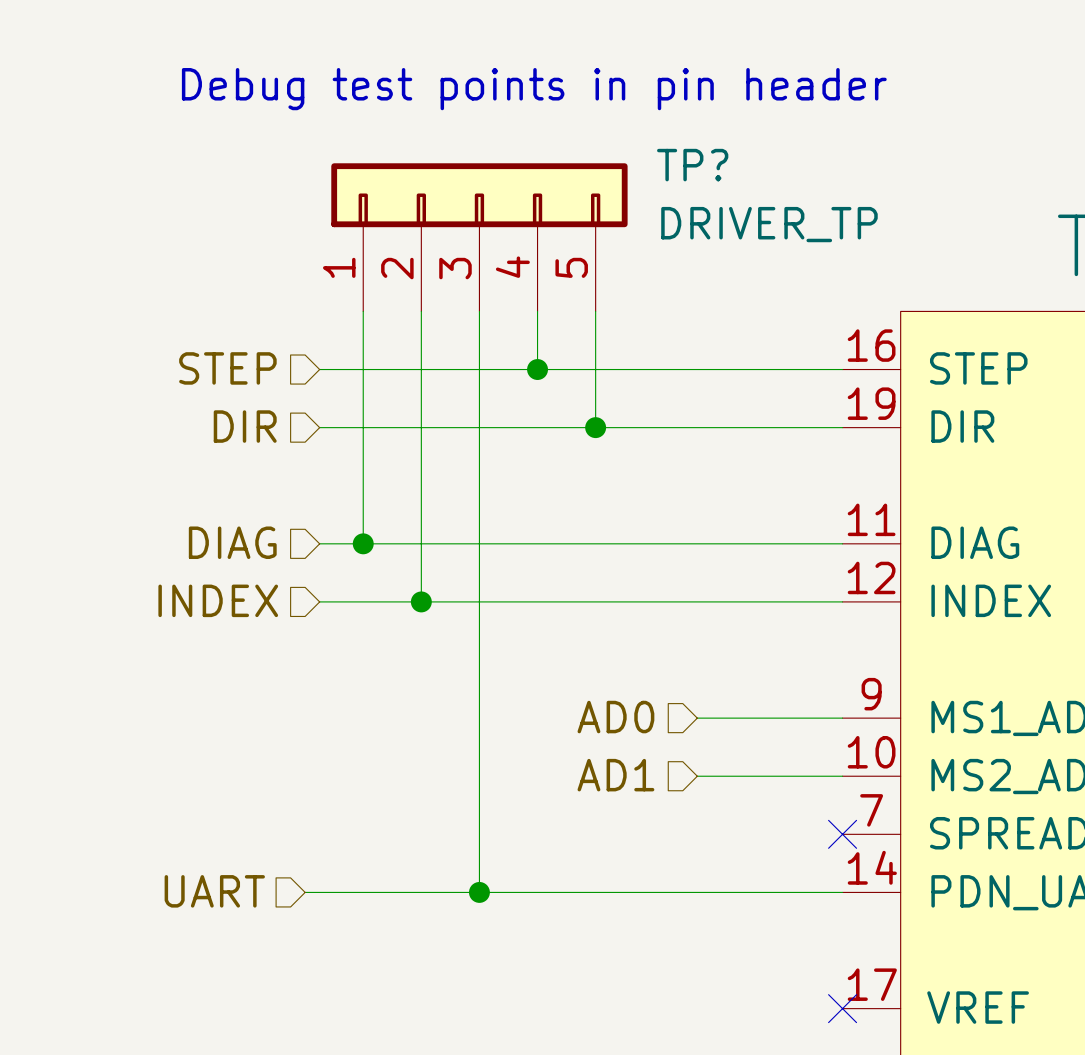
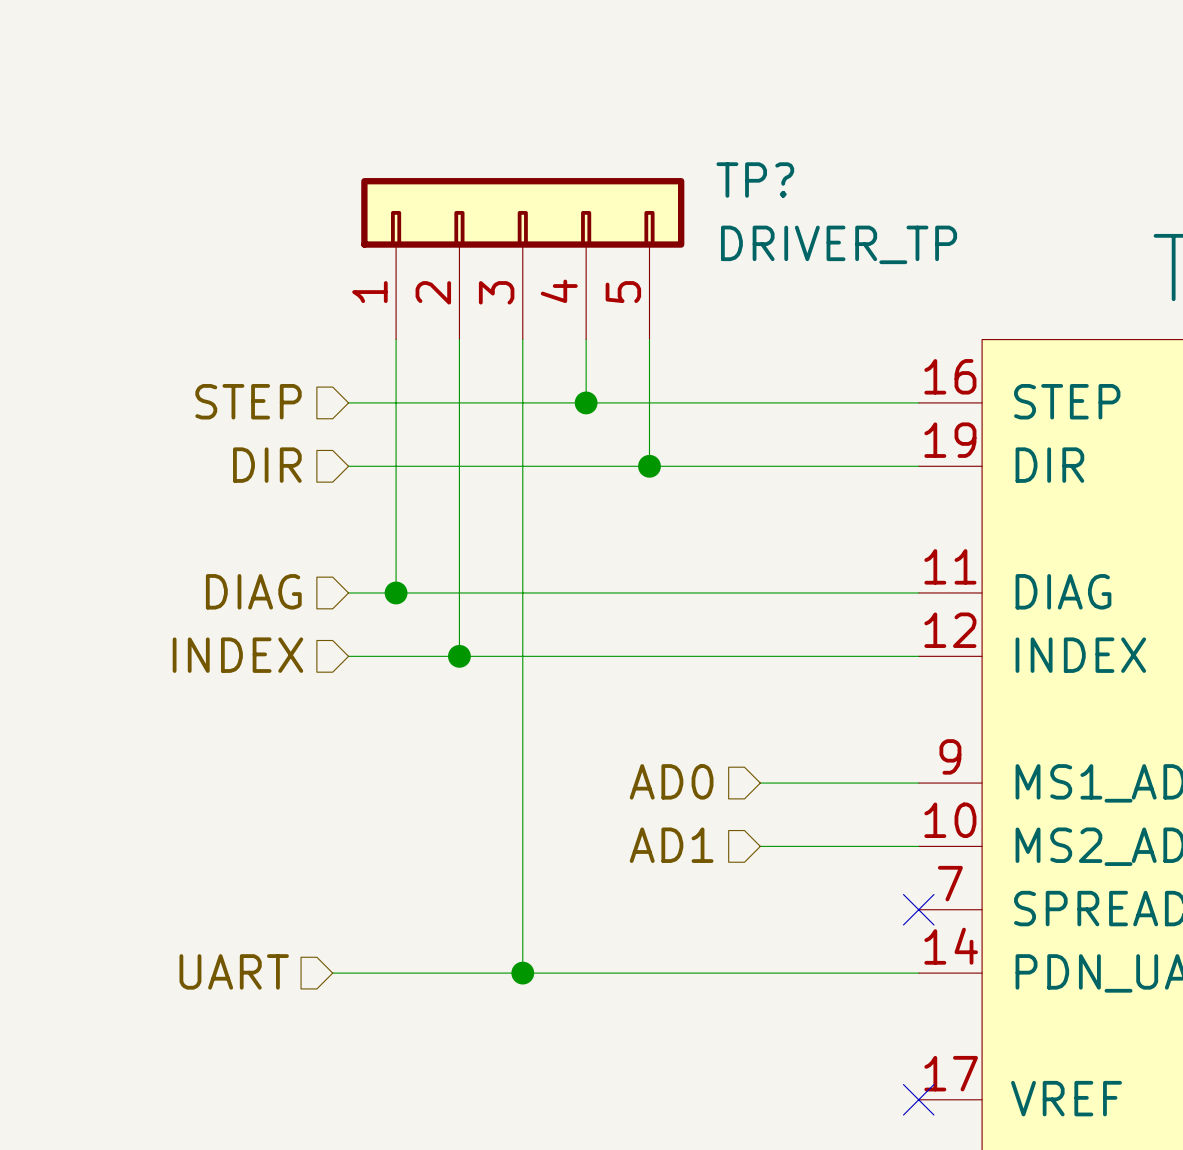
text: Debug test points in pin header (534, 89) -> none

